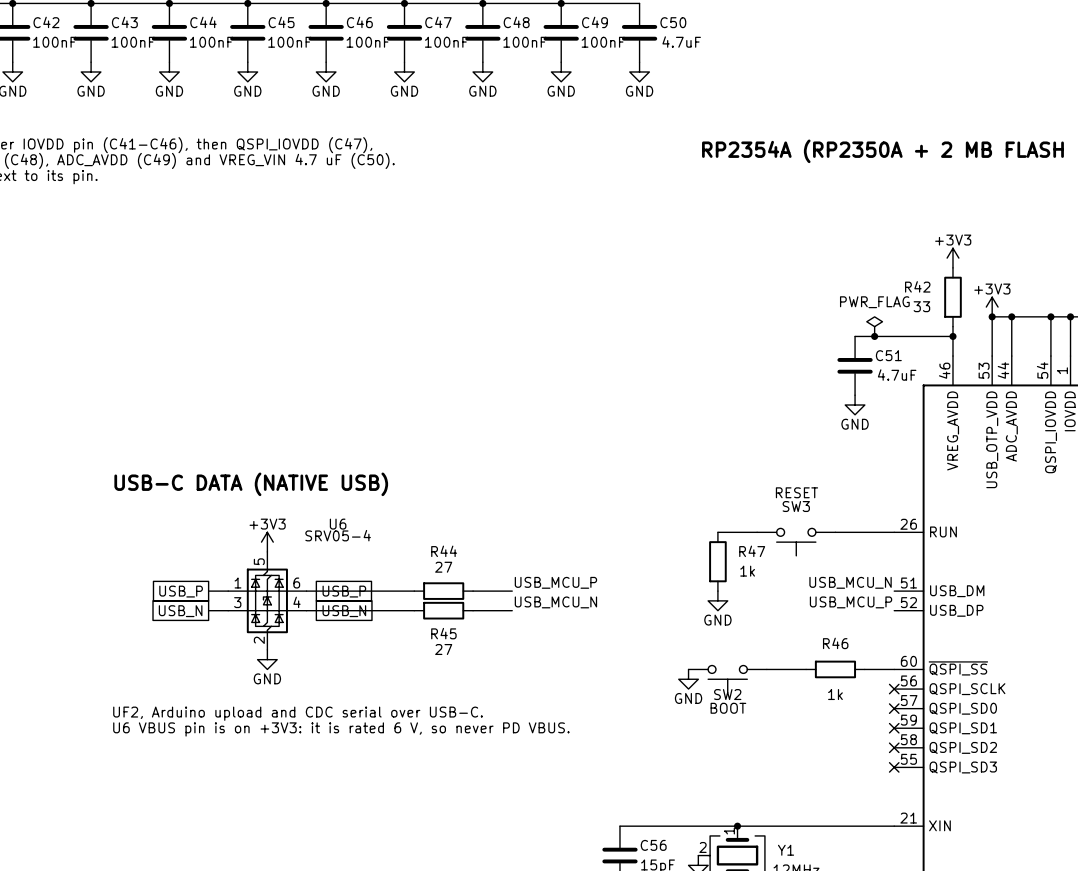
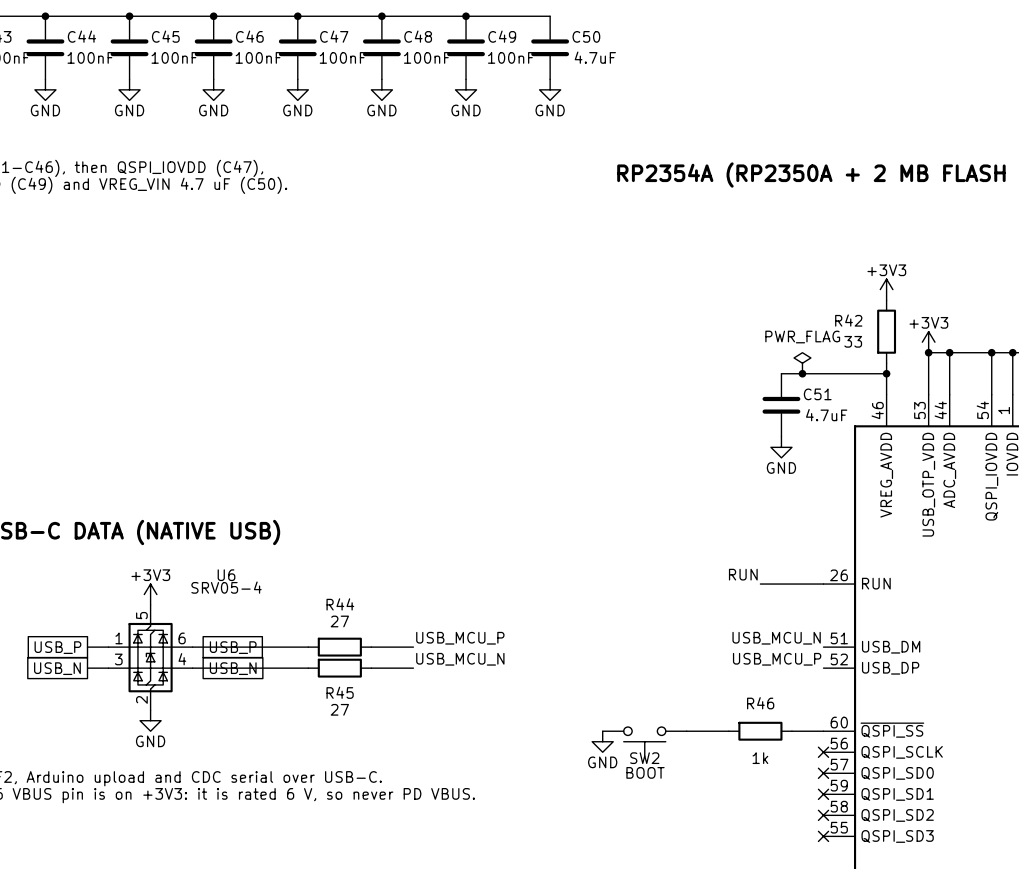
label: none -> RUN (743, 574)
wire: (717, 532) (757, 532) -> none
SW3: RESET (796, 542) -> none
R47: 1k (717, 561) -> none
power symbol: GND (717, 600) -> none

